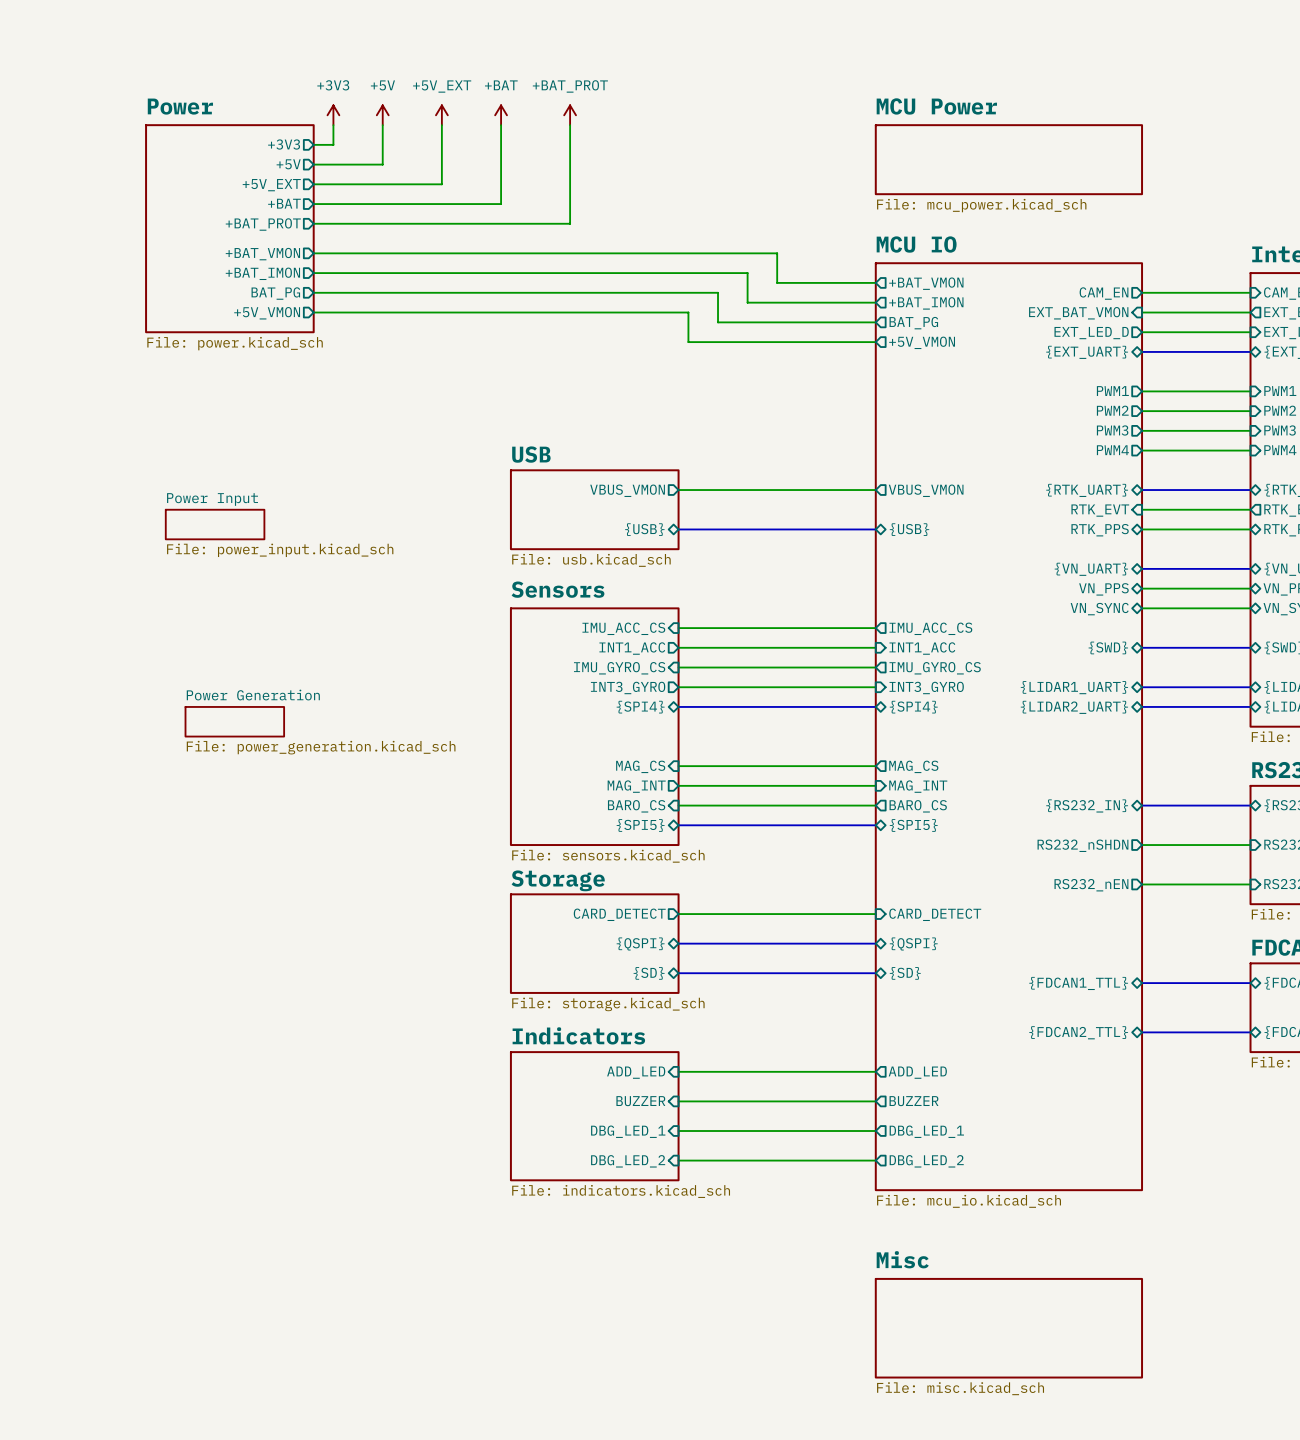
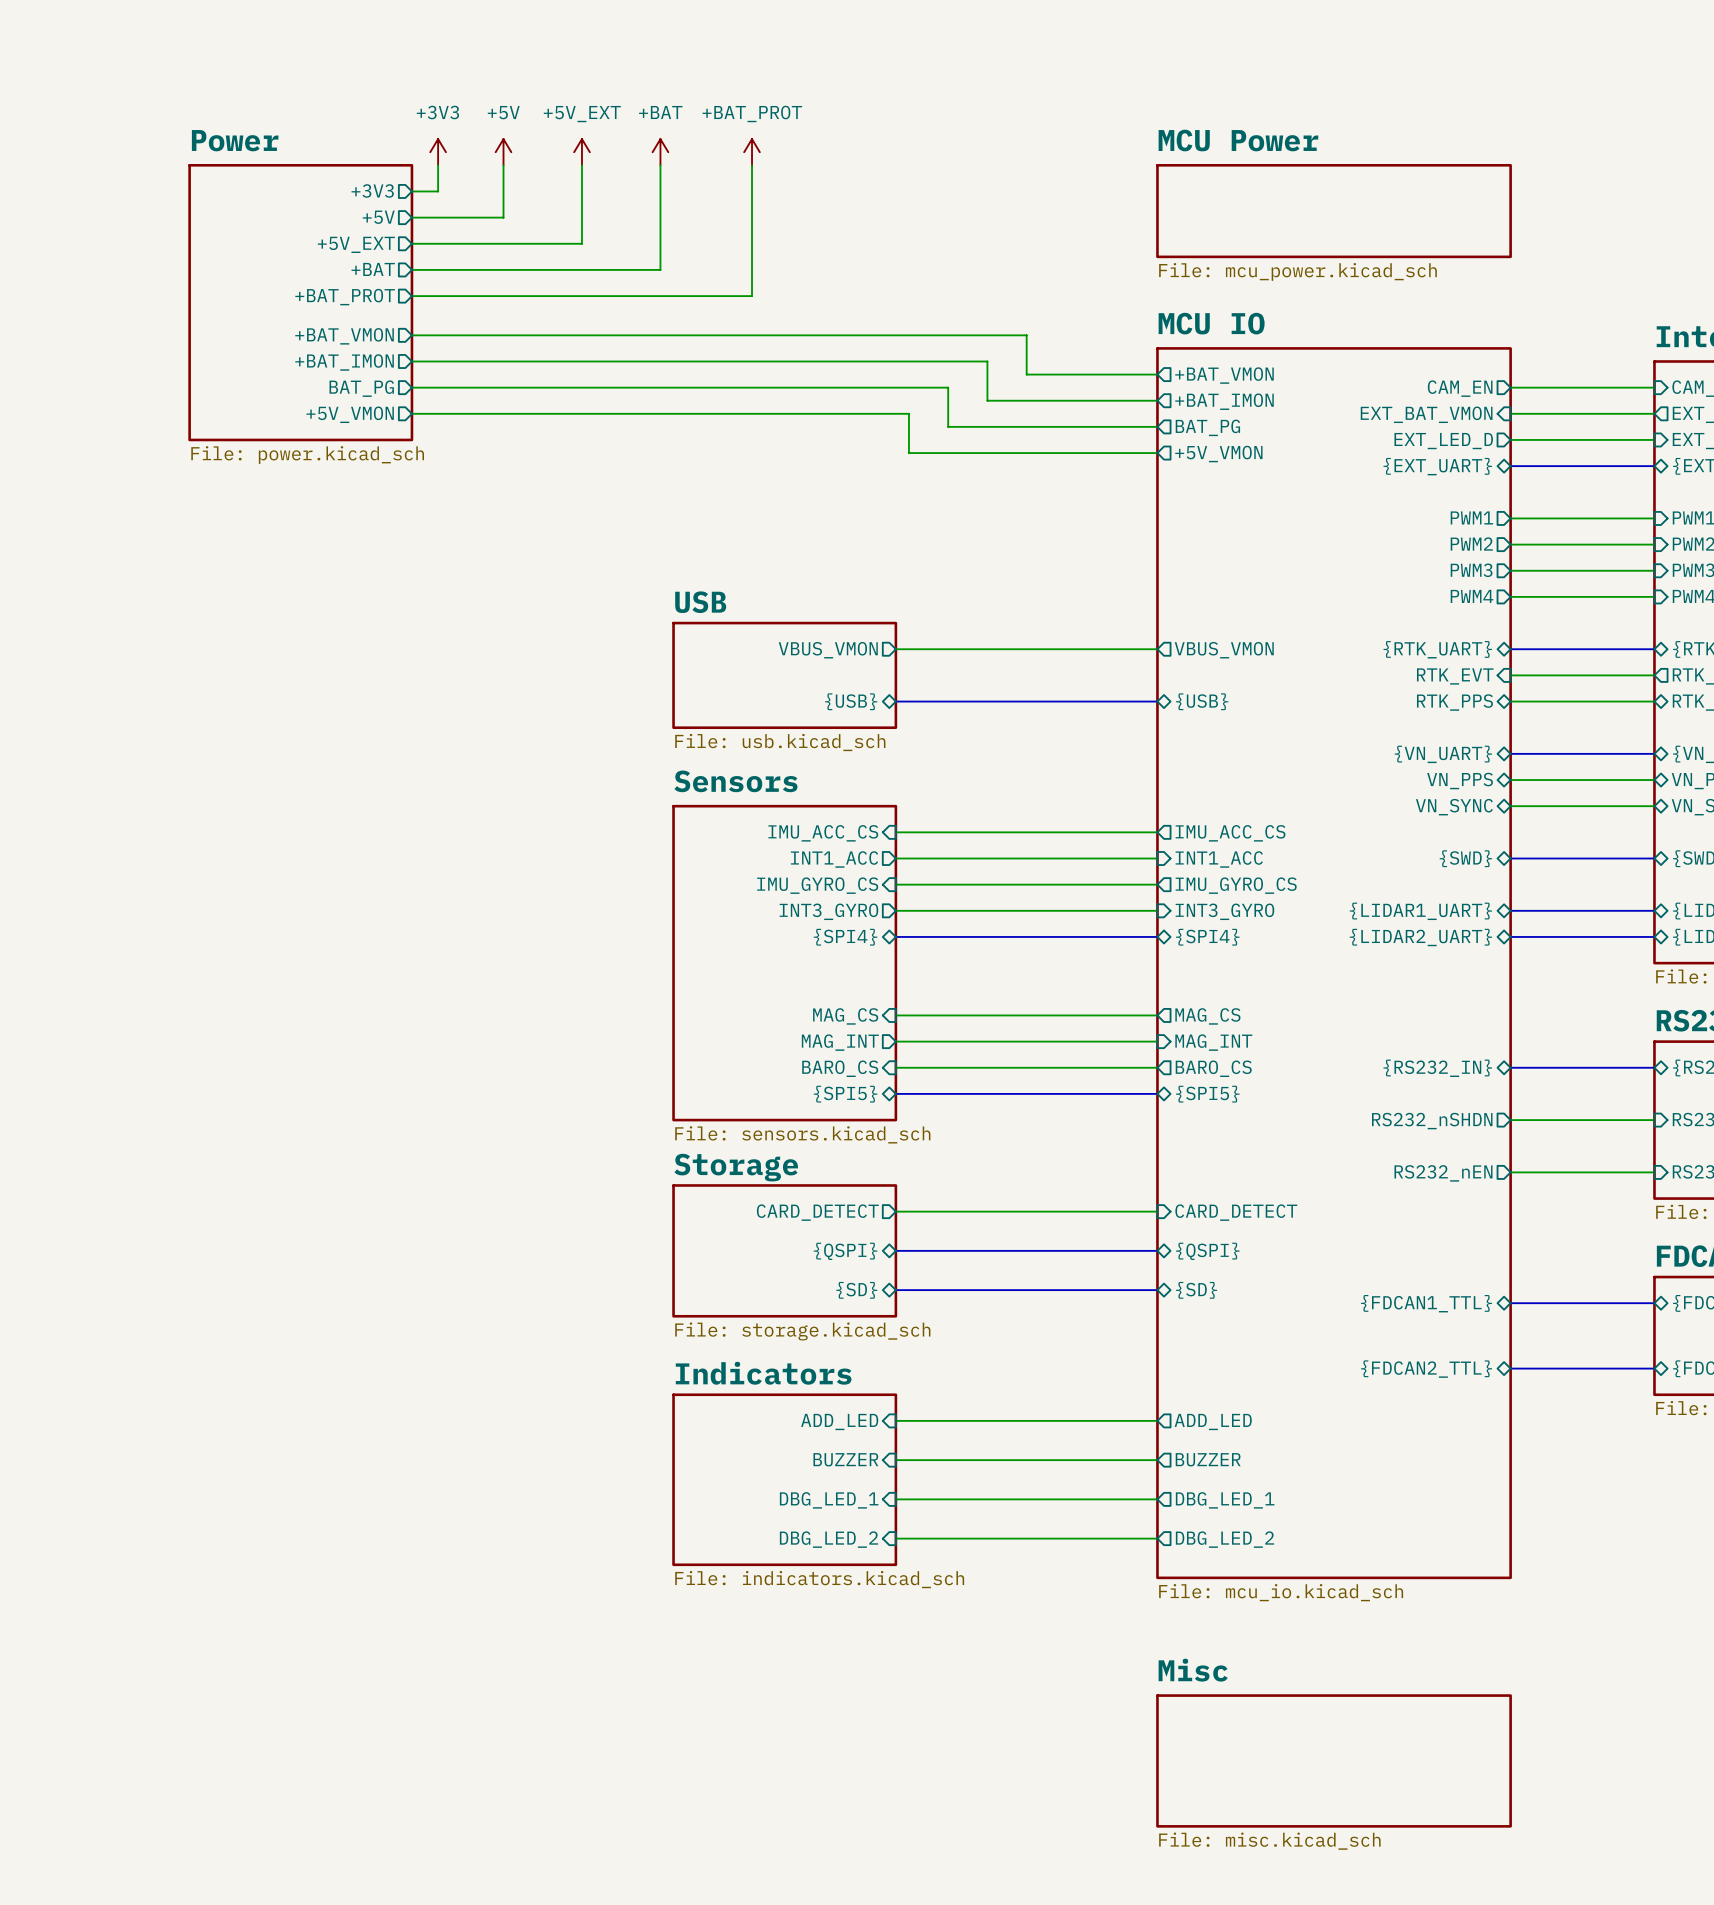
sheet Power Input: File: power_input.kicad_sch (215, 524) -> none
sheet Power Generation: File: power_generation.kicad_sch (234, 721) -> none

